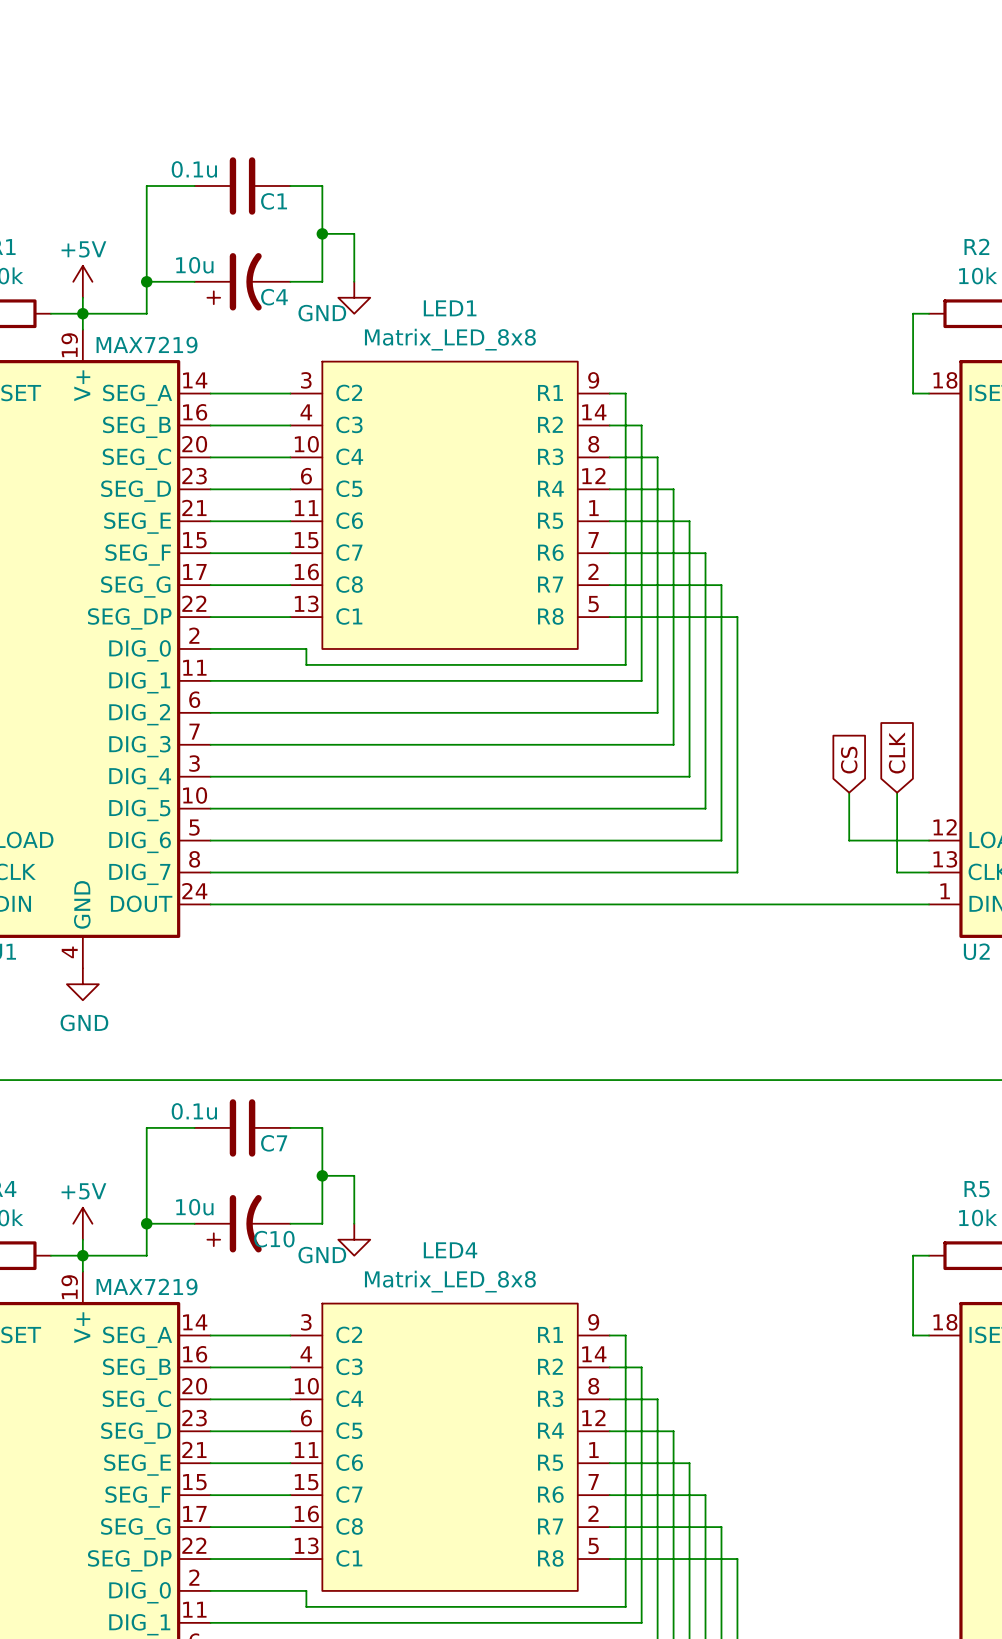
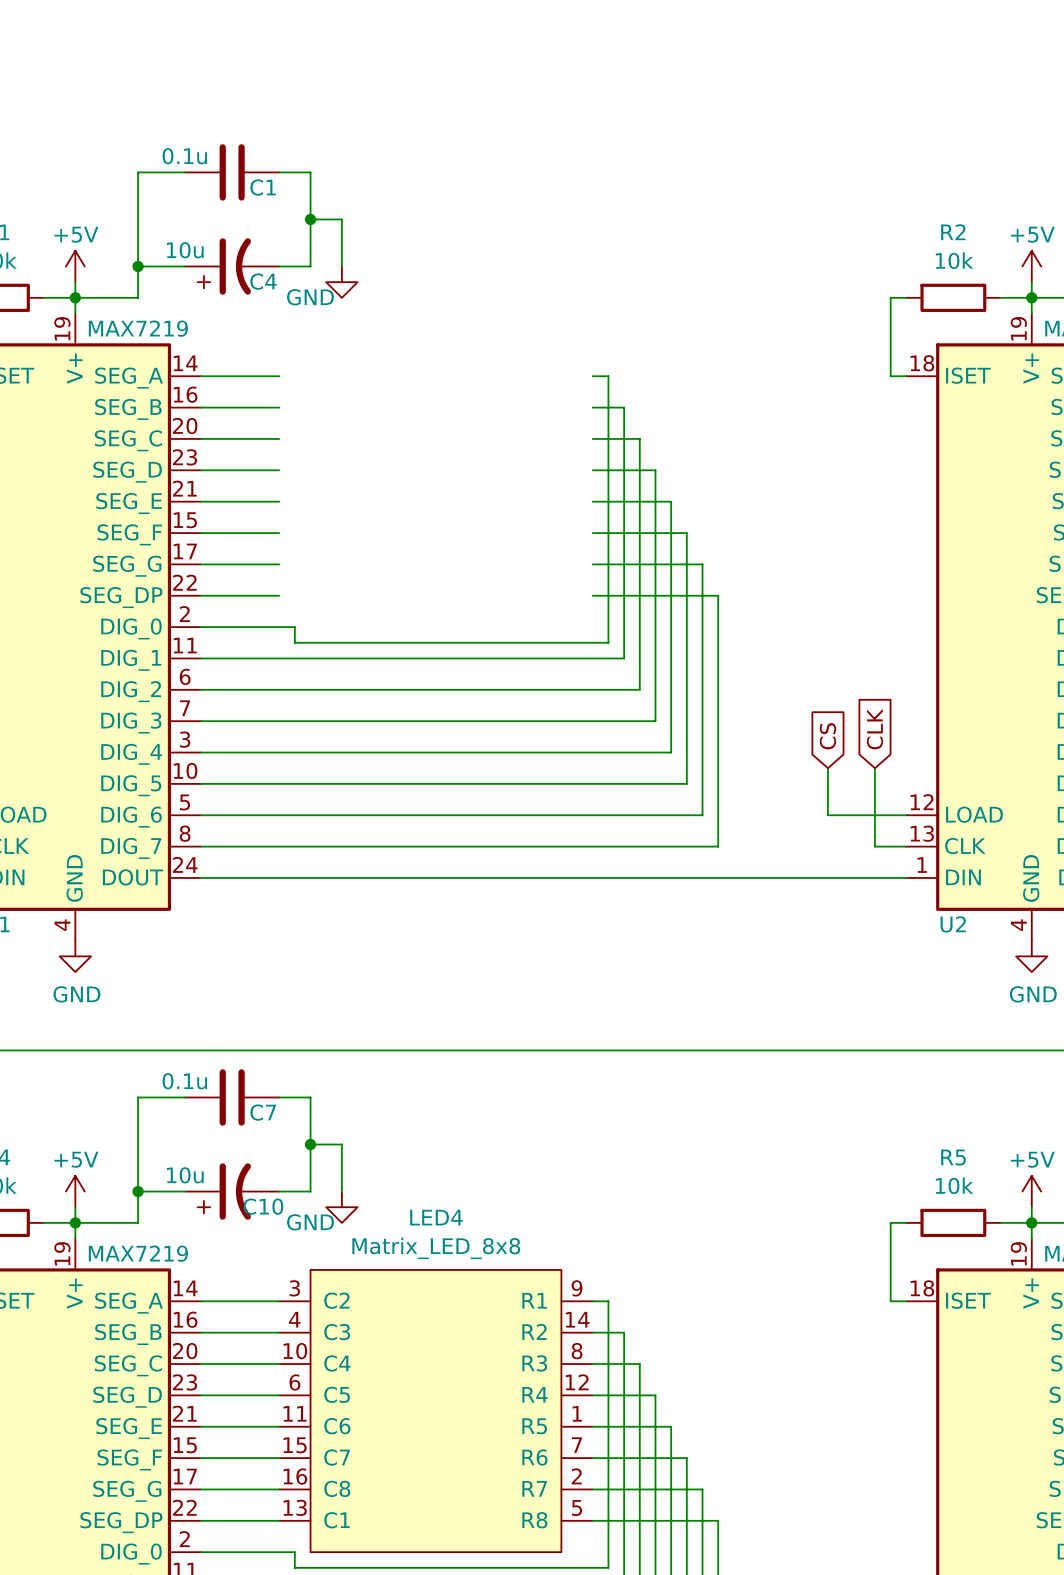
LED1: Matrix_LED_8x8 (450, 505) -> none

